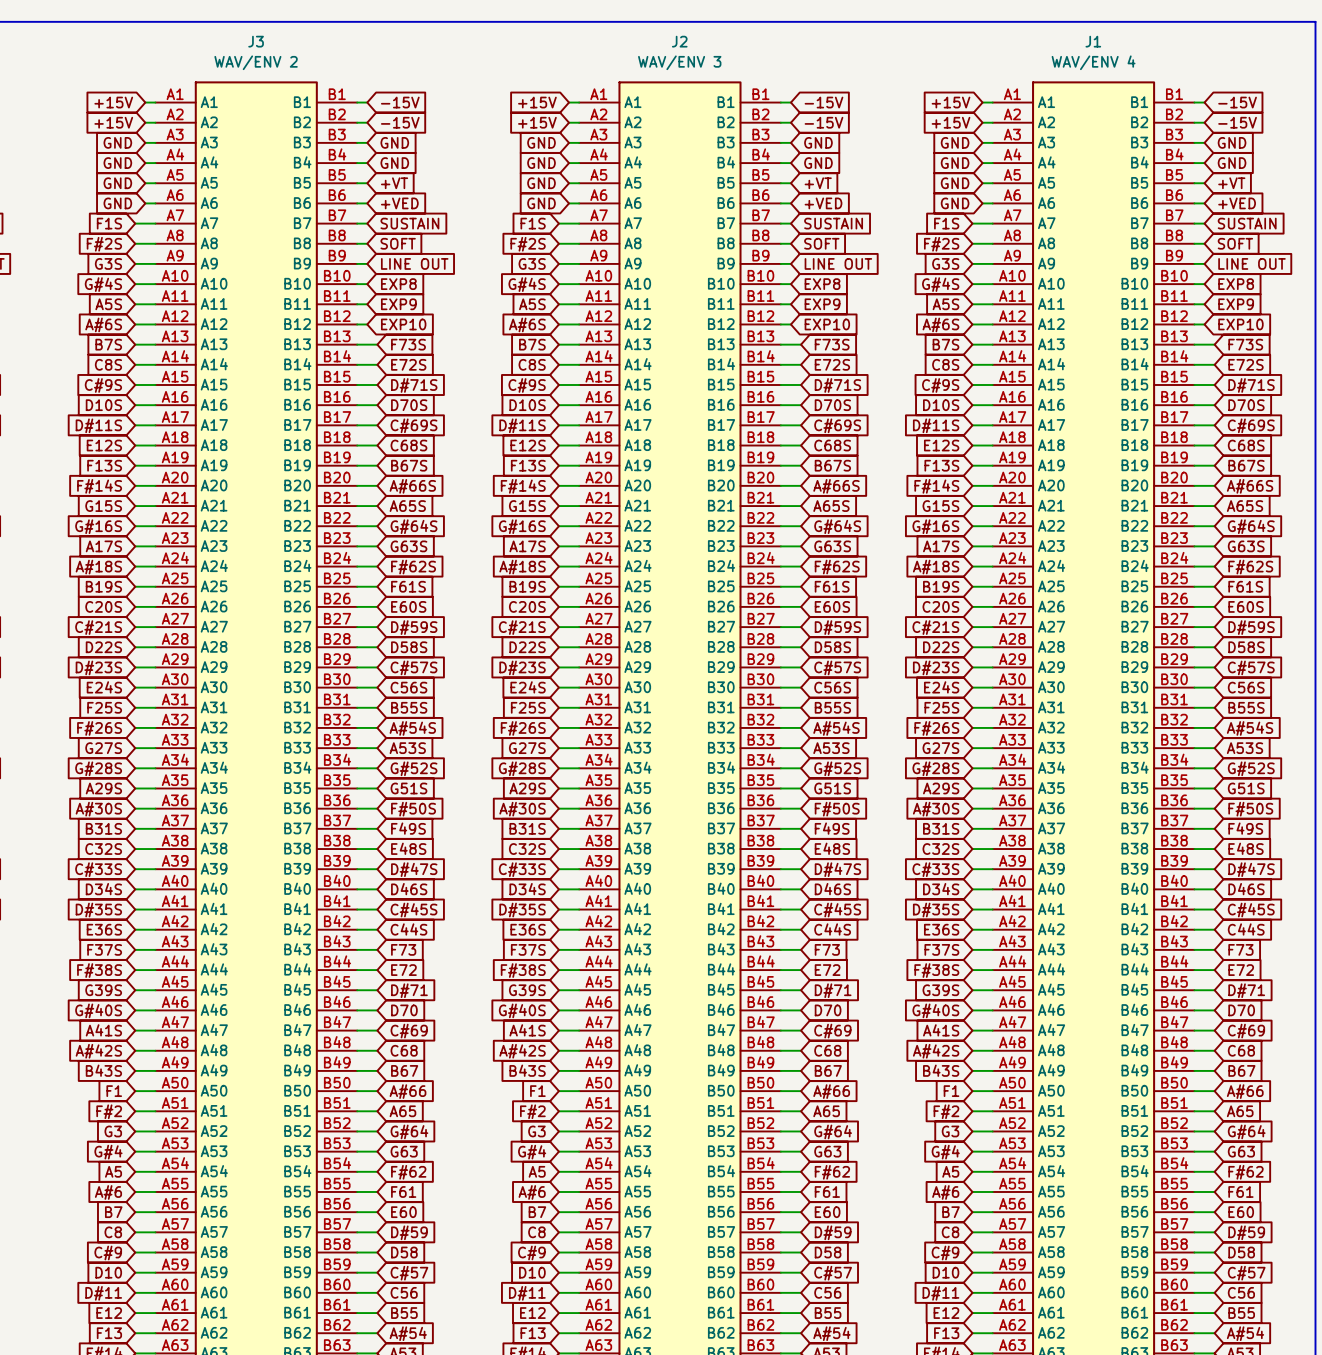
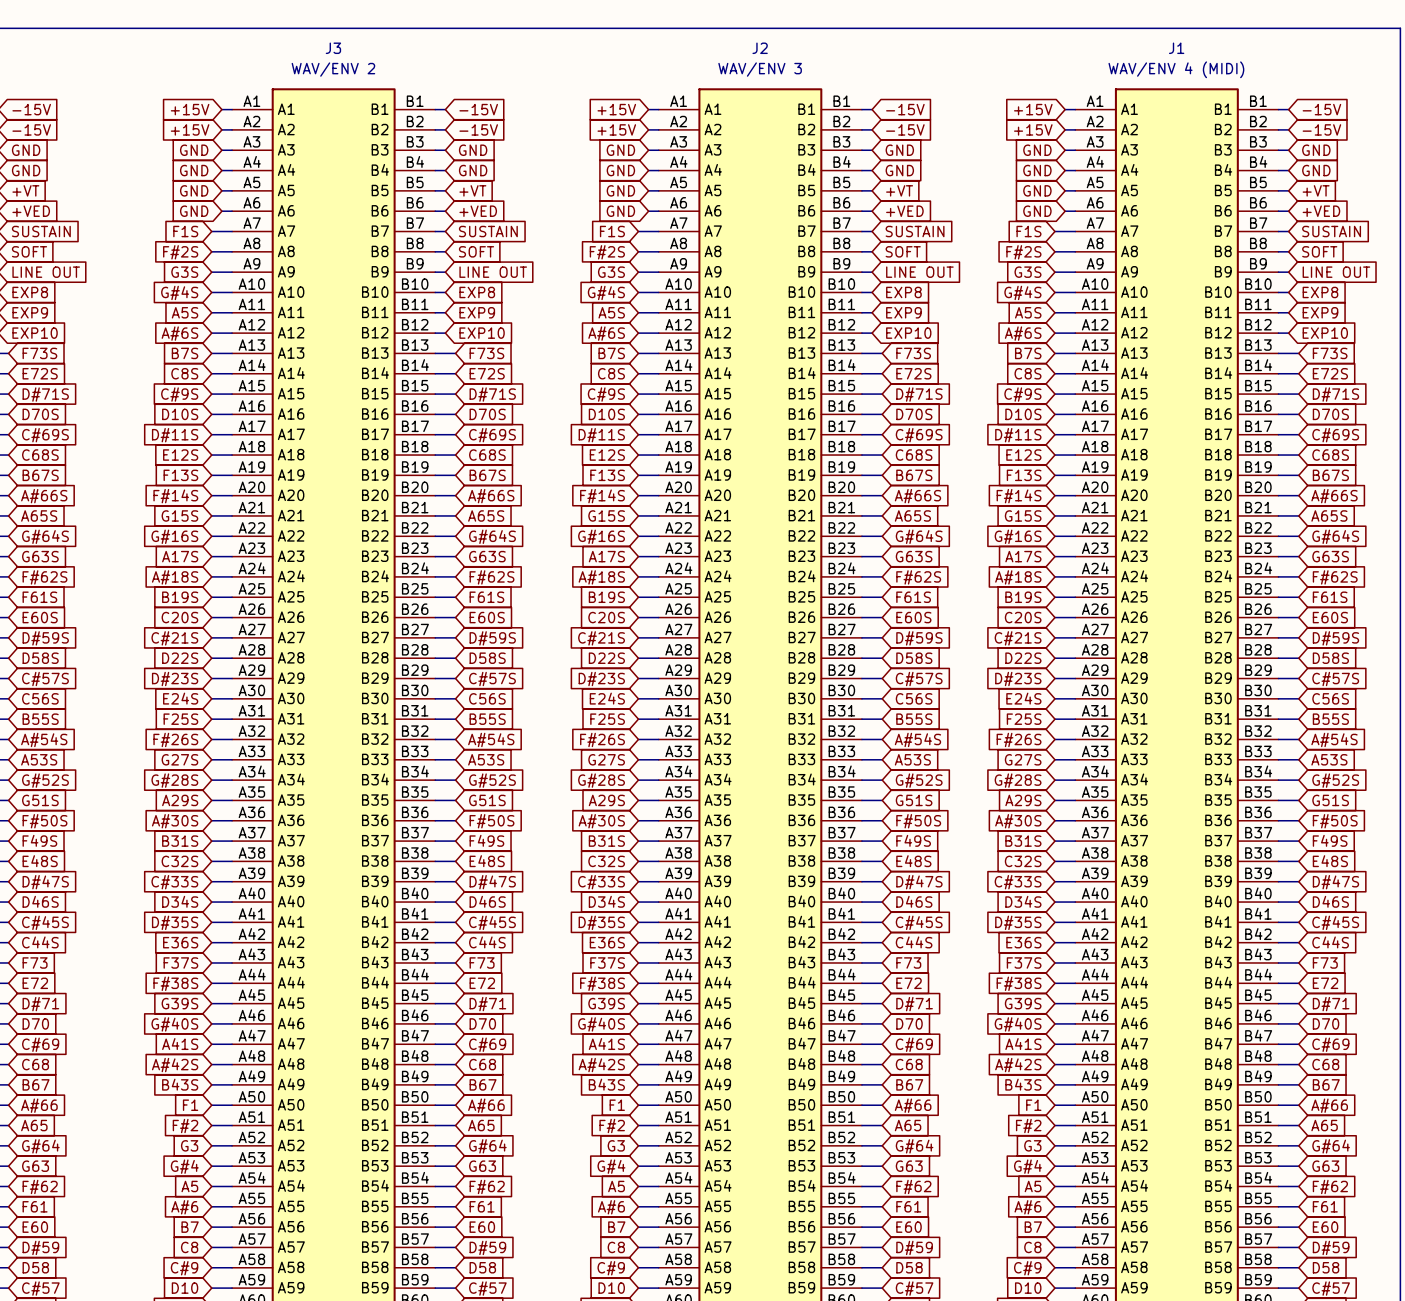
J1 value: WAV/ENV 4 (1093, 62) -> WAV/ENV 4 (MIDI) (1176, 69)

